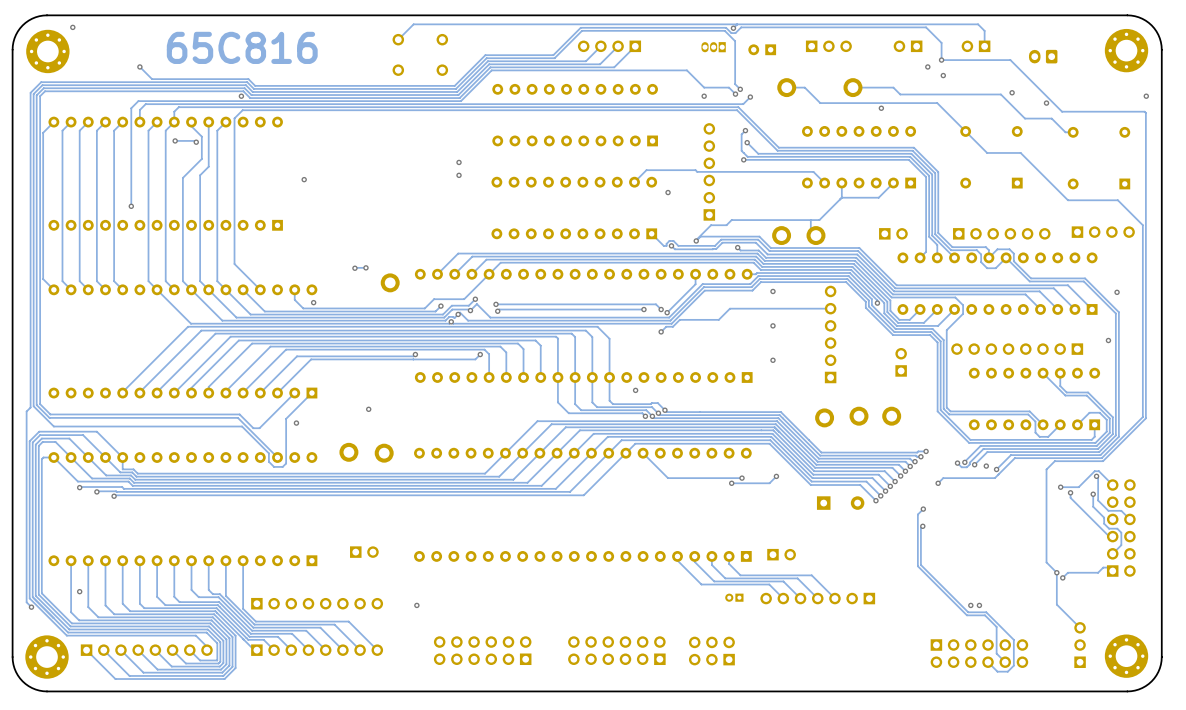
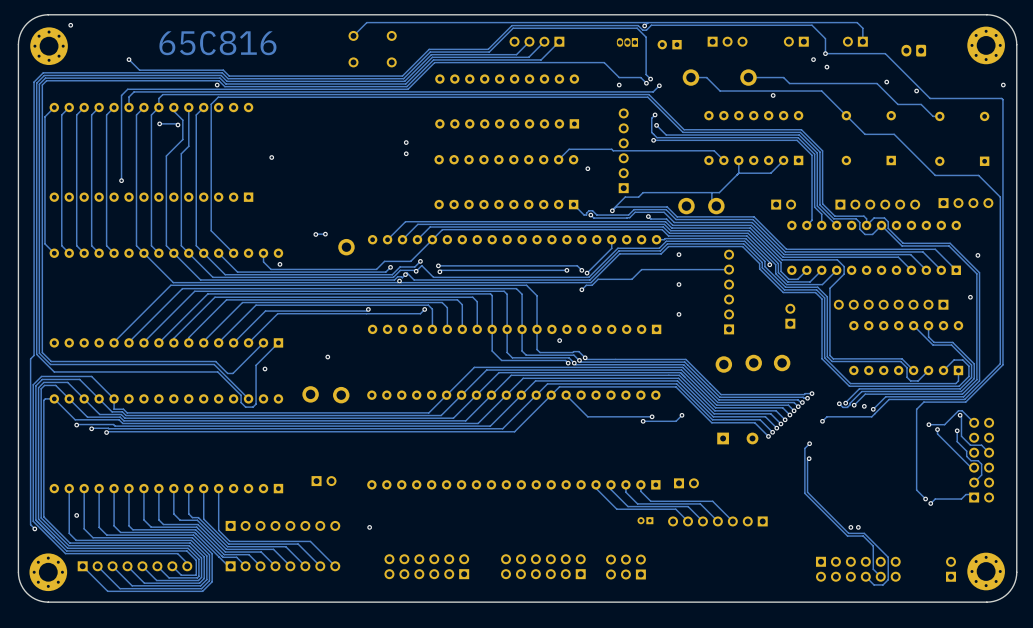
track: (1056, 572) (1056, 604) (1080, 627) -> none
part: (1080, 645) -> none
part: none -> (951, 569)

